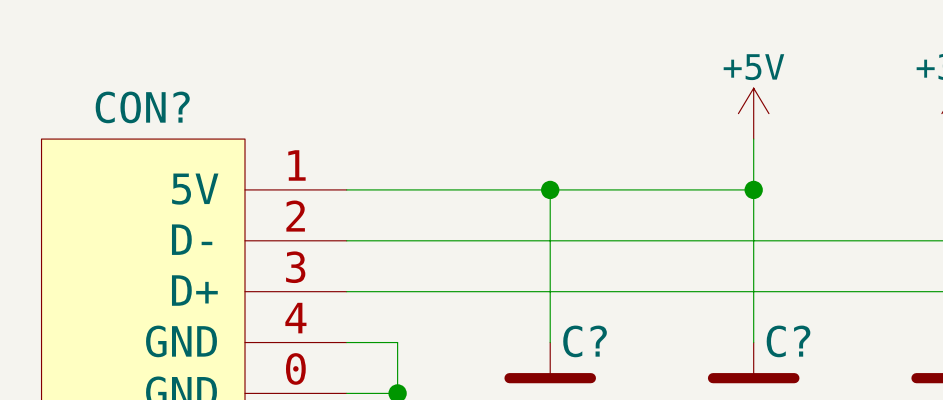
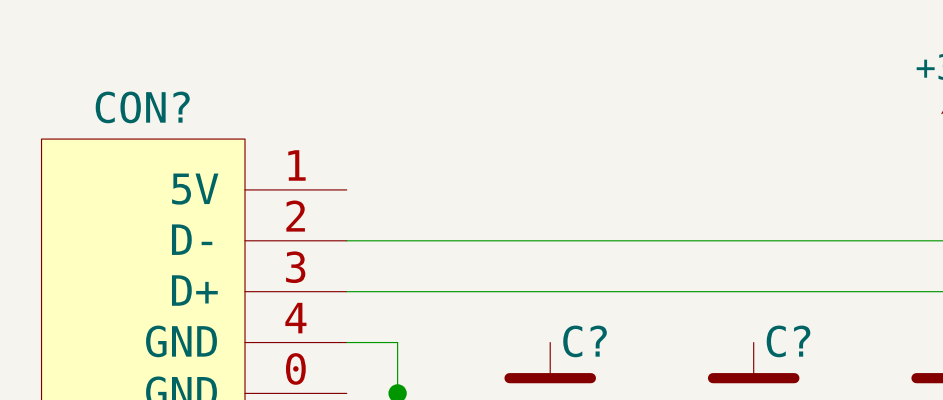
power symbol: +5V (753, 113) -> none
wire: (753, 139) (753, 342) -> none
wire: (346, 189) (753, 189) -> none
wire: (550, 189) (550, 342) -> none
junction: (550, 189) -> none
junction: (753, 189) -> none
wire: (346, 393) (397, 393) -> none

